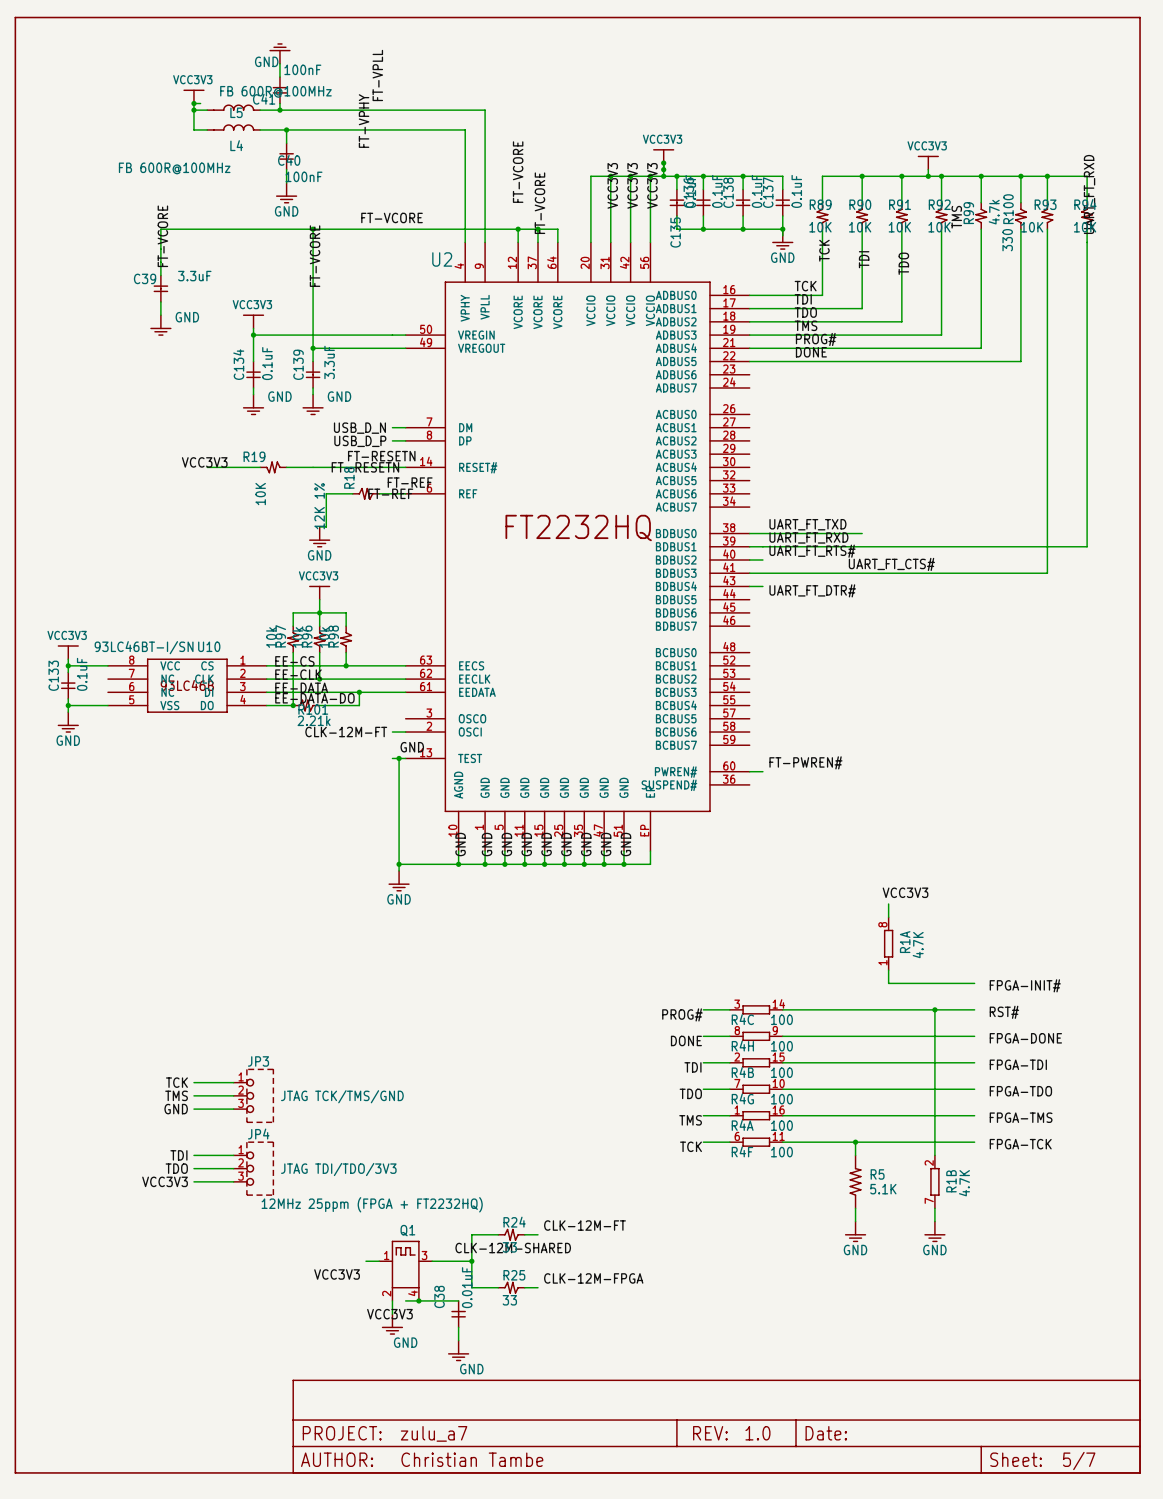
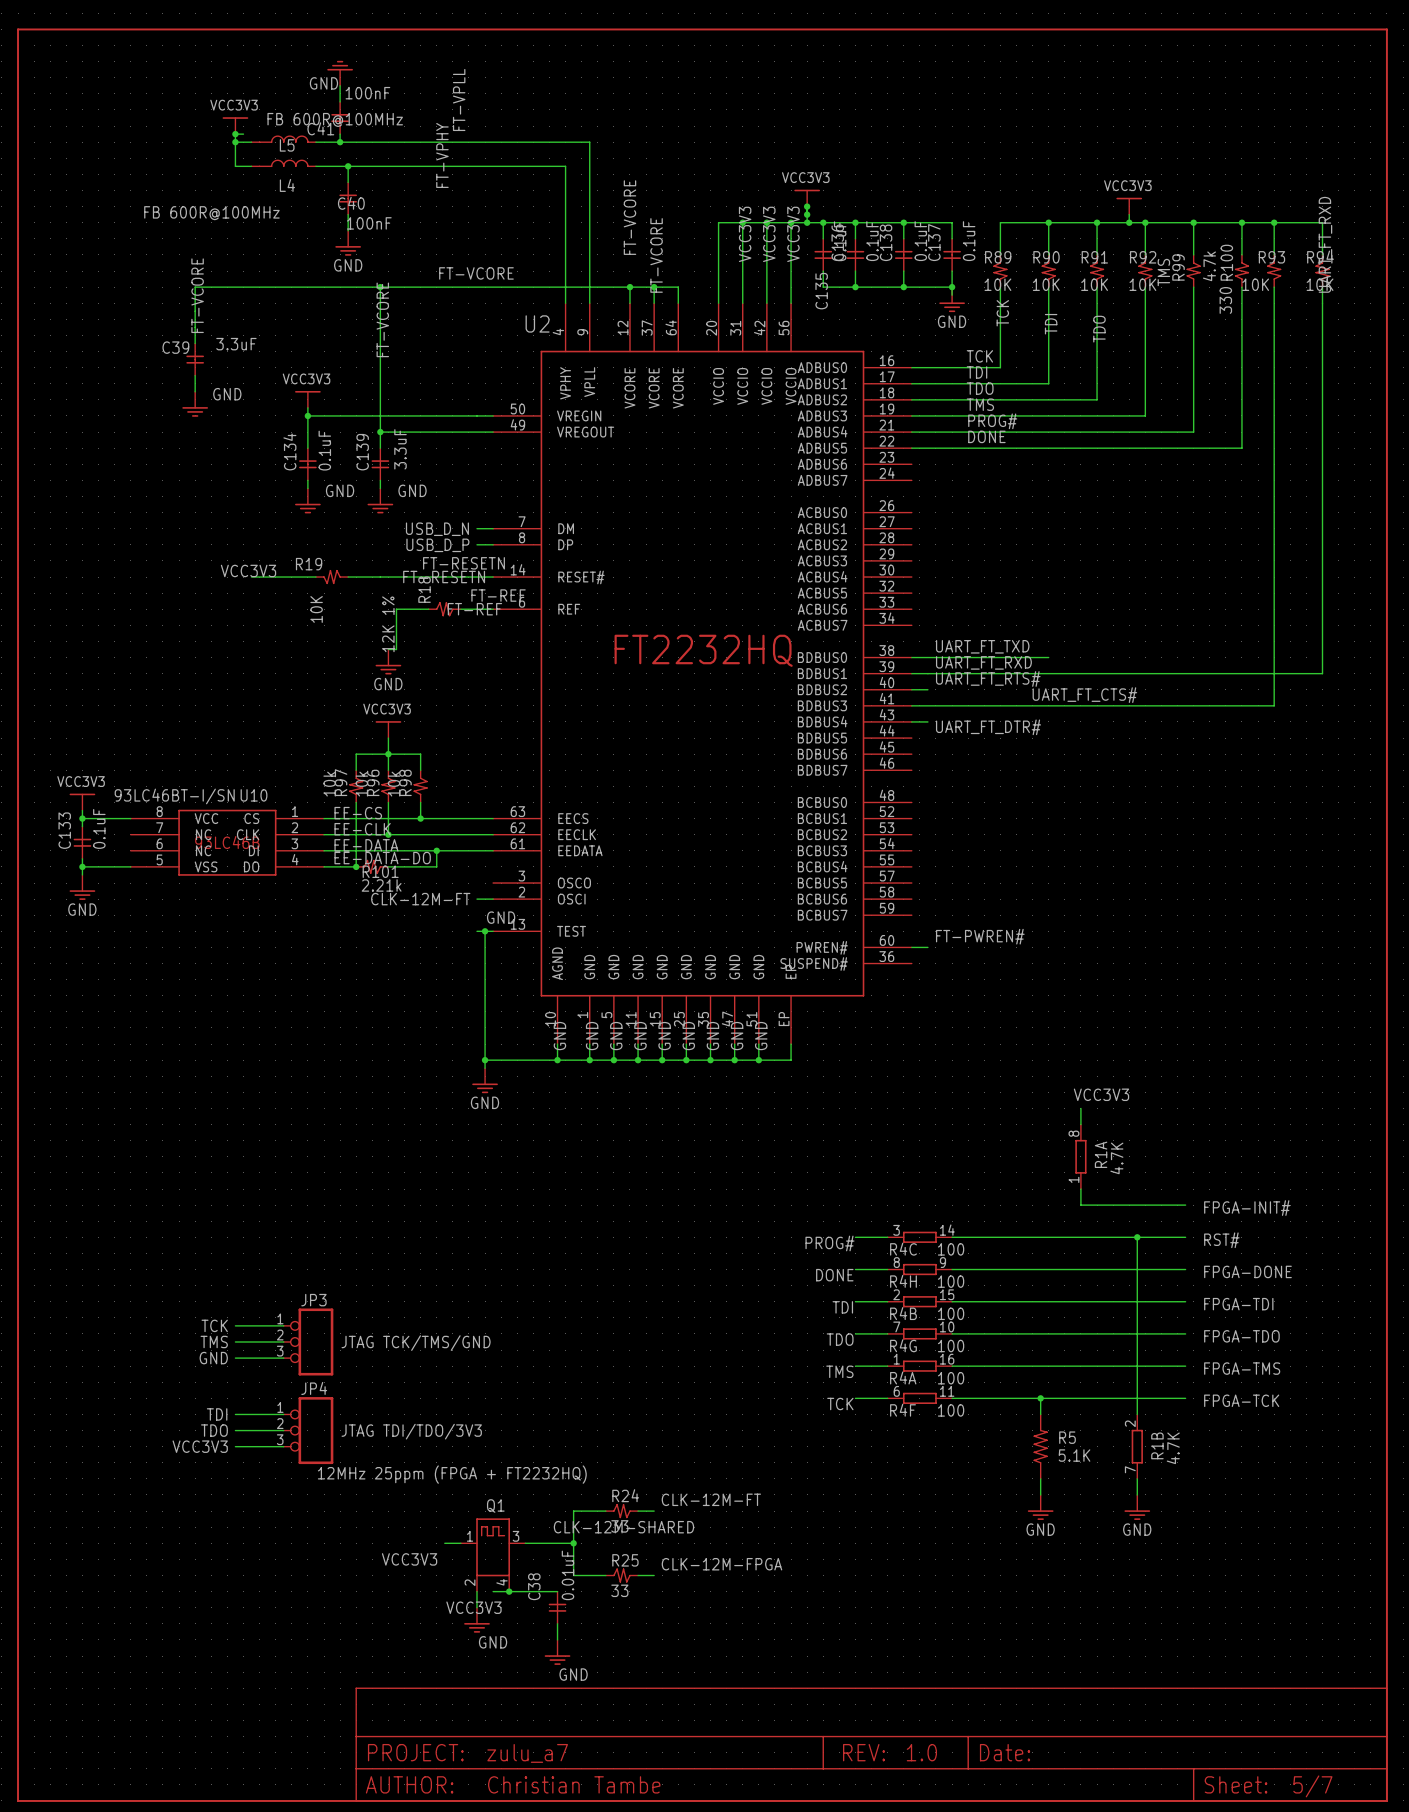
JP3 symbol: [233, 1069, 274, 1123] -> [283, 1308, 334, 1376]
JP4 symbol: [233, 1141, 274, 1196] -> [283, 1397, 334, 1465]

